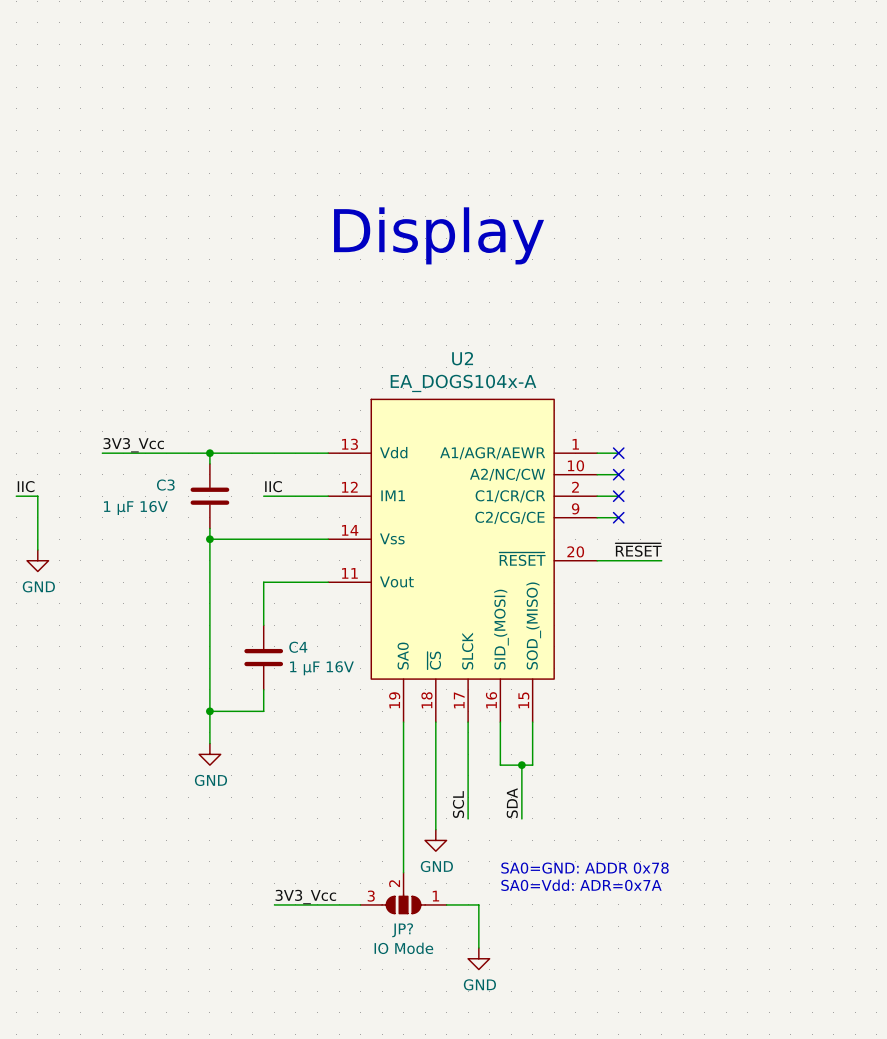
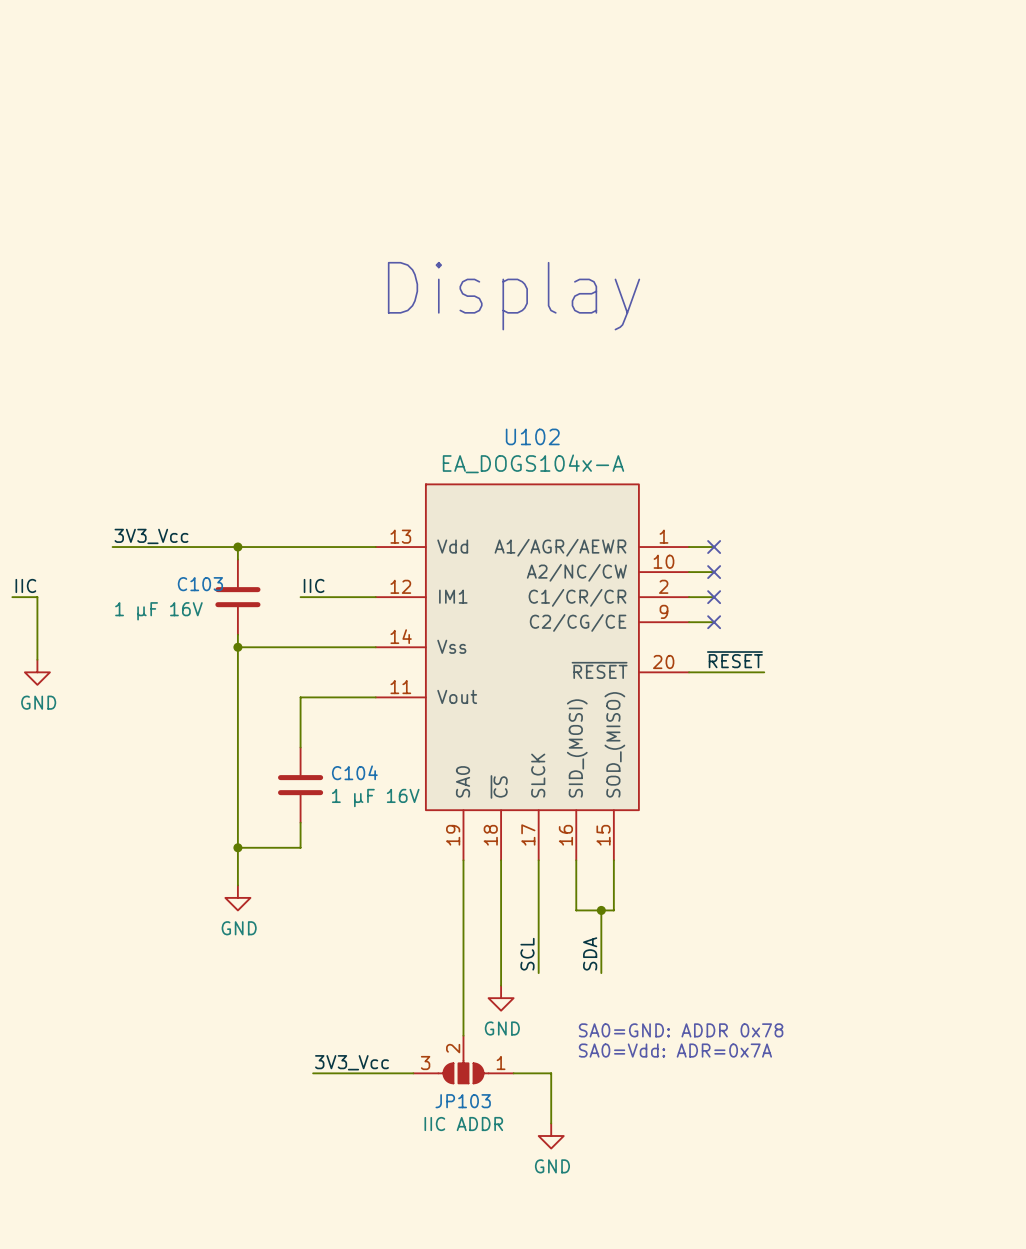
U2 name: U2 (462, 358) -> U102 (532, 436)
C3 name: C3 (165, 485) -> C103 (200, 584)
C4 name: C4 (298, 647) -> C104 (354, 772)
JP? name: JP? (402, 930) -> JP103 (463, 1101)
JP? value: IO Mode (403, 948) -> IIC ADDR (463, 1124)

